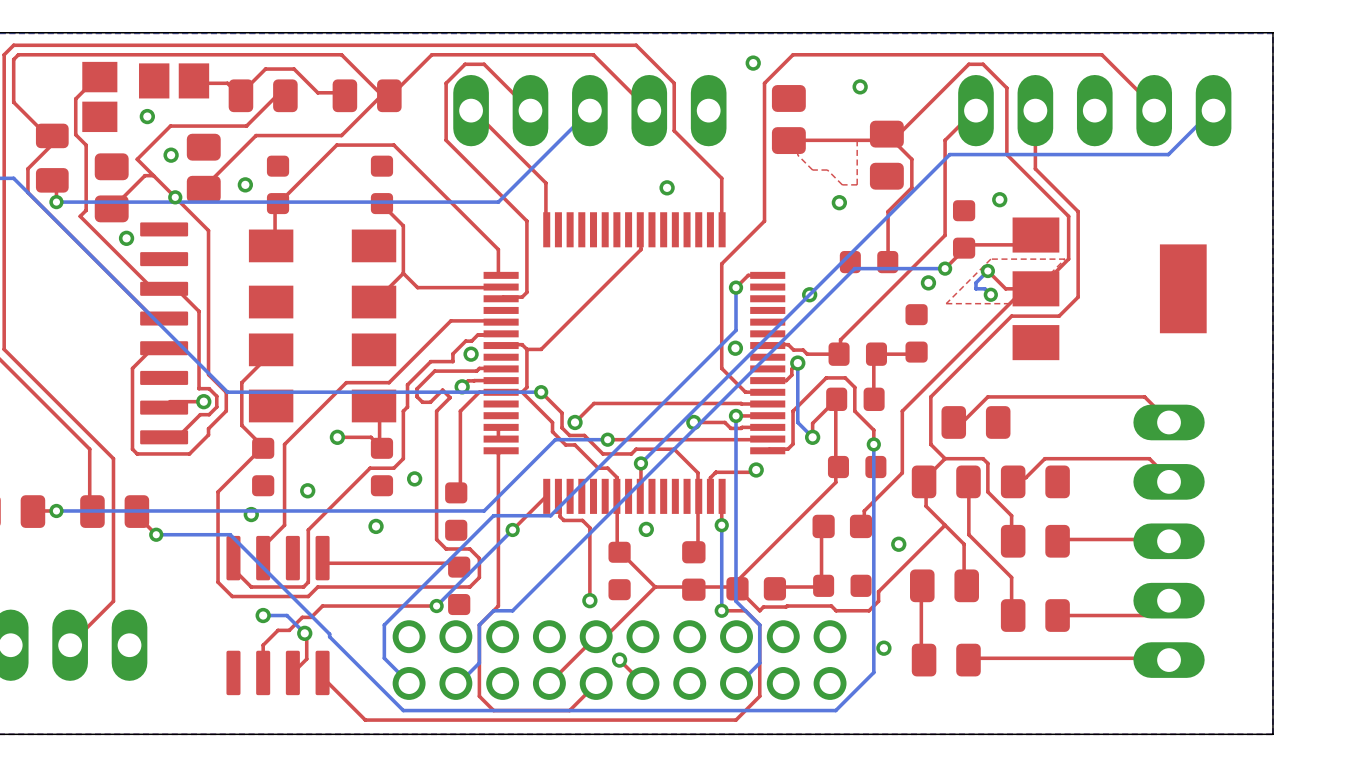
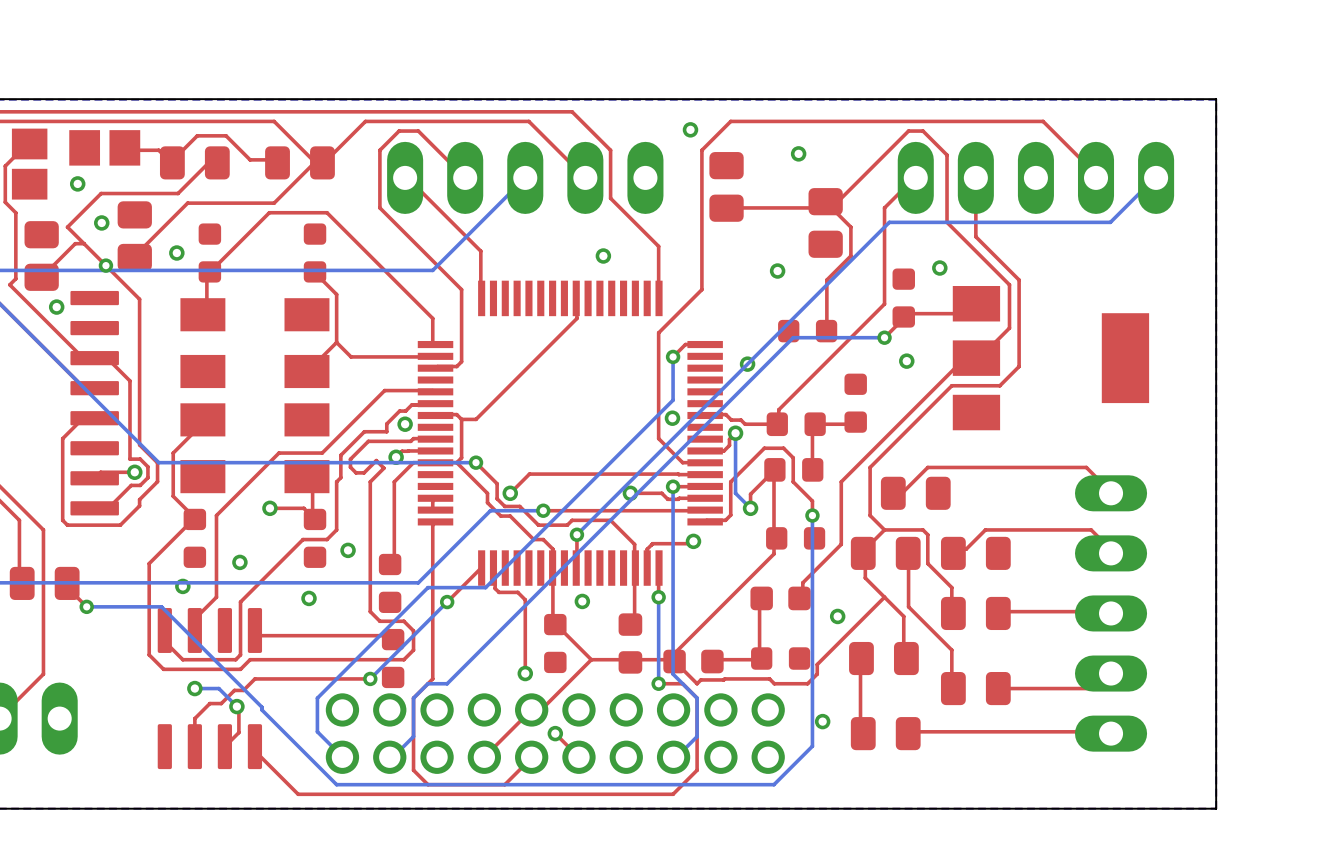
top zone outline: (857, 140) (857, 184) (842, 184) (827, 170) (812, 170) (797, 155) (797, 140) (857, 140) -> none
top zone outline: (1065, 259) (990, 259) (946, 303) (1050, 303) (1050, 273) (1065, 259) -> none
top track: (987, 271) (1005, 288) (1035, 288) -> none
bottom track: (987, 271) (975, 282) (975, 288) (984, 288) (990, 294) -> none
via: (987, 271) -> none
via position: (928, 282) -> (906, 361)
via: (990, 294) -> none

